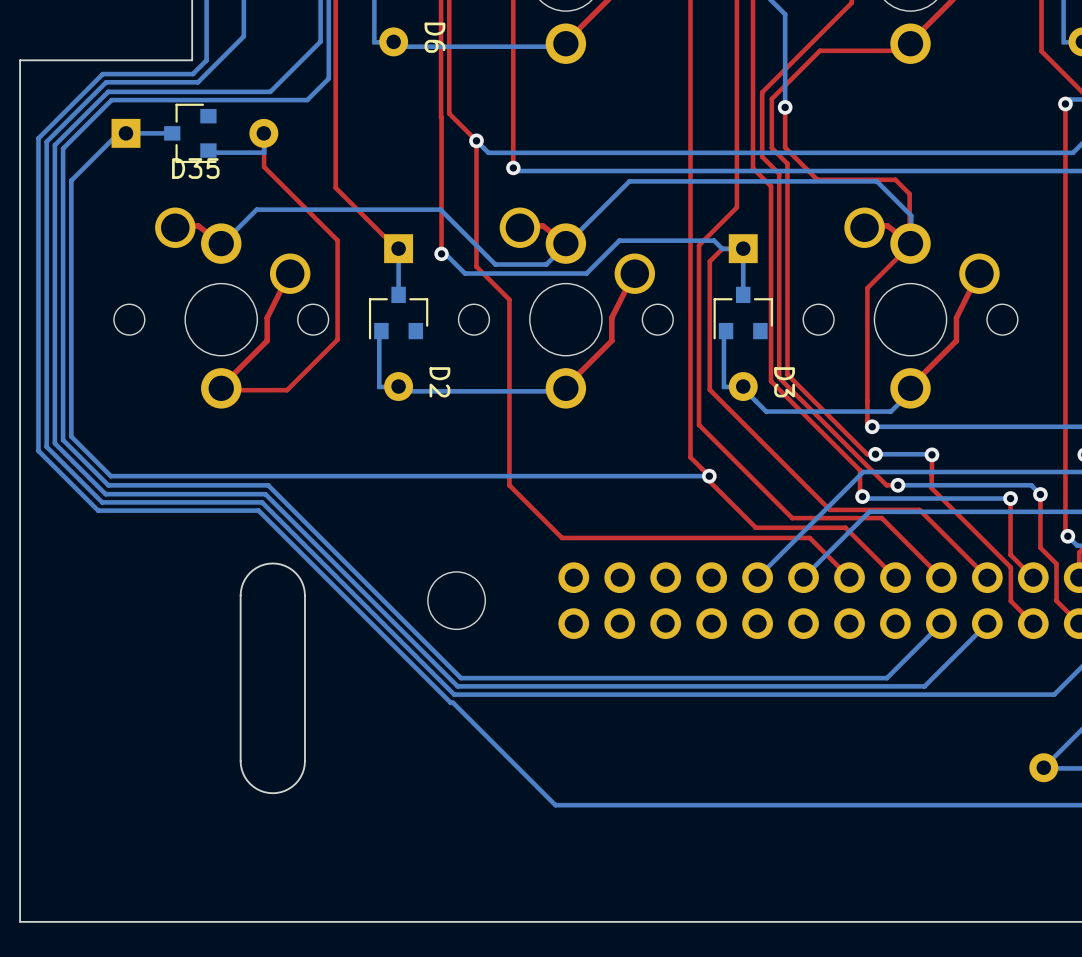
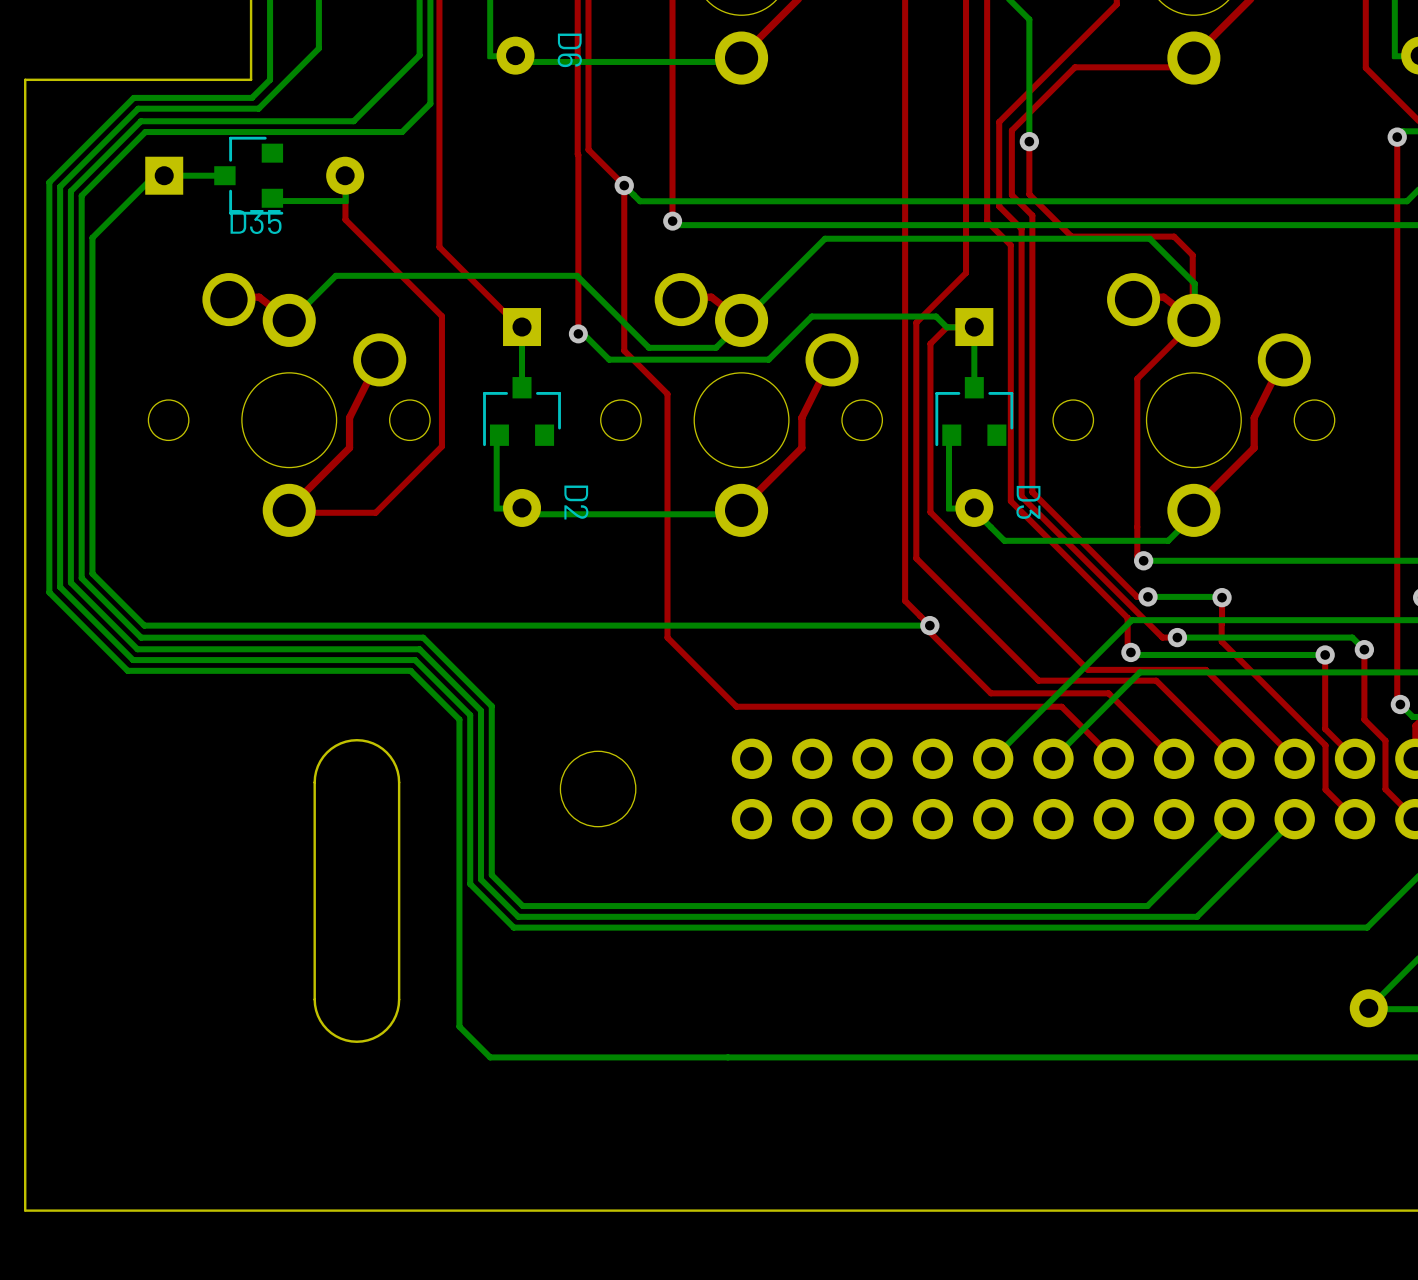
bottom track: (268, 485) (461, 678) (886, 678) -> (350, 637) (423, 637) (491, 706) (491, 875) (522, 906) (1147, 906) (1162, 890)
bottom track: (265, 494) (457, 686) (924, 686) -> (347, 649) (419, 649) (480, 710) (480, 879) (518, 916) (1197, 916) (1212, 901)
bottom track: (262, 502) (454, 694) (1054, 694) -> (342, 660) (415, 660) (470, 715) (470, 884) (513, 927) (1367, 927) (1382, 912)
bottom track: (258, 510) (555, 805) -> (338, 670) (410, 670) (459, 719) (459, 1026) (490, 1057) (727, 1057)

